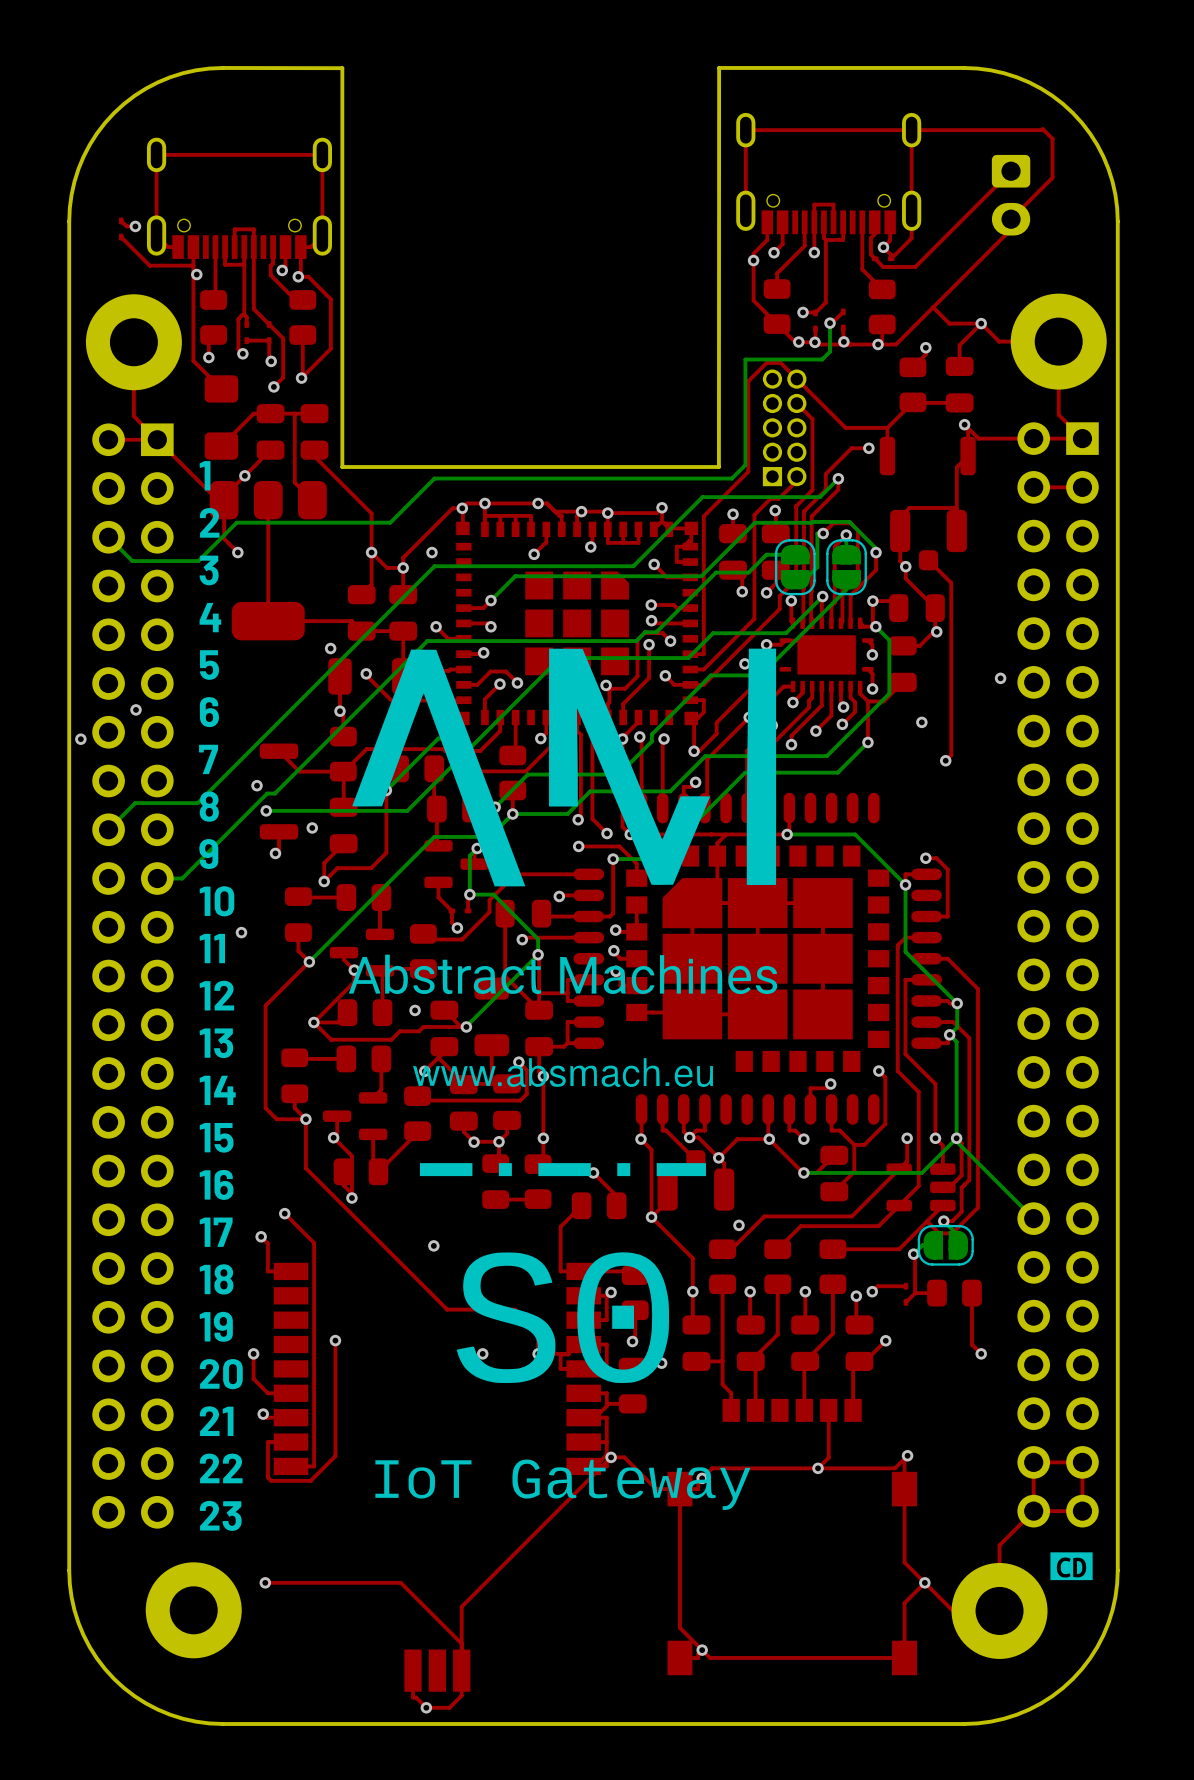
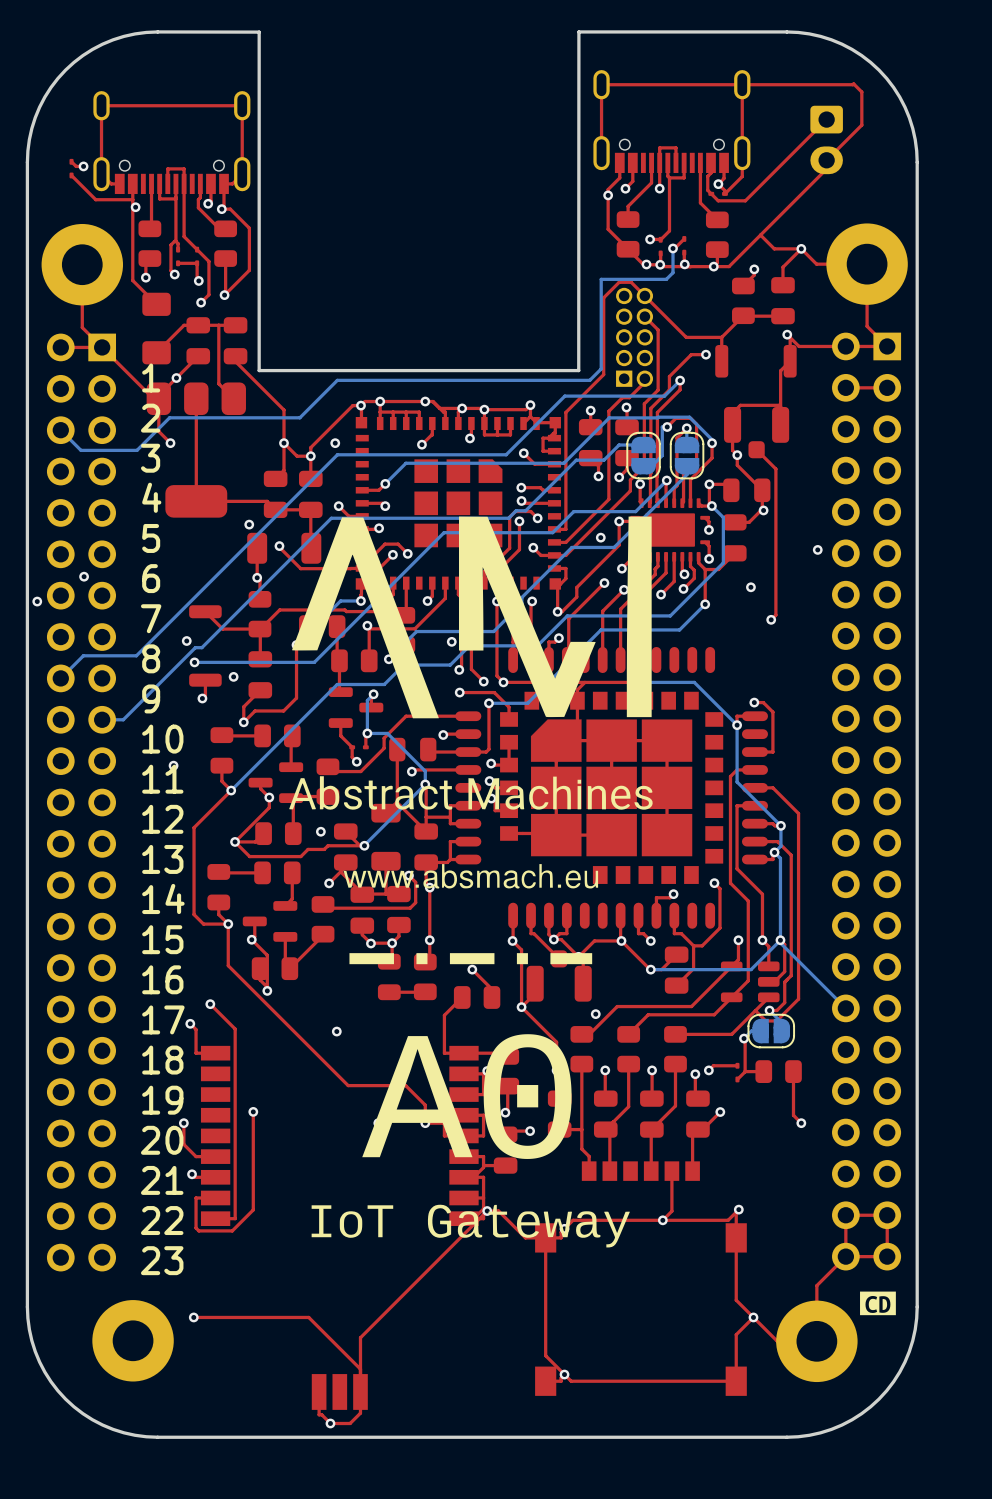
drawing: none -> [289, 516, 653, 1248]
drawing: [348, 648, 778, 1510] -> none

